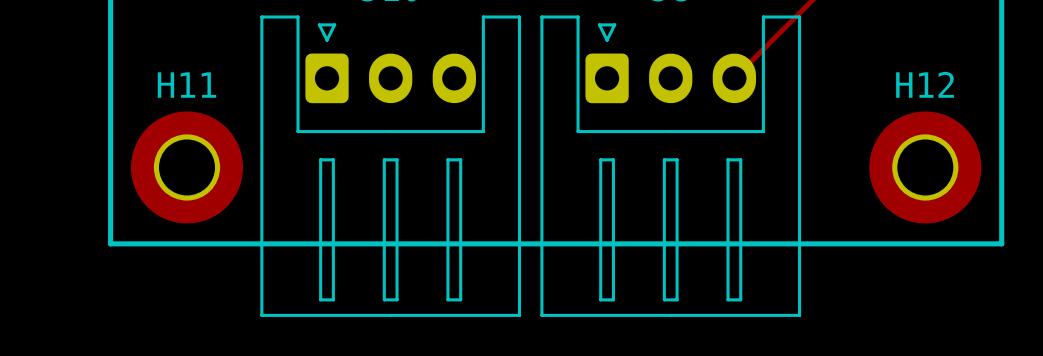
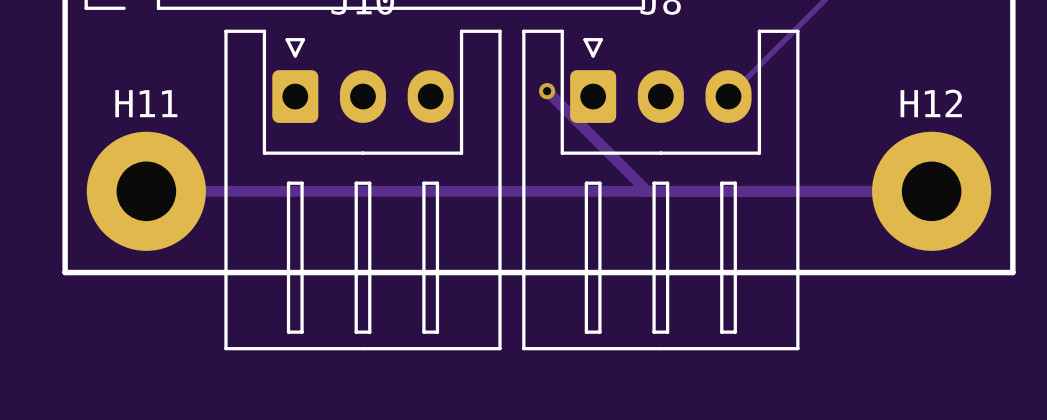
track: none -> (547, 91) (647, 191)
via: none -> (547, 91)
track: none -> (146, 191) (931, 191)

